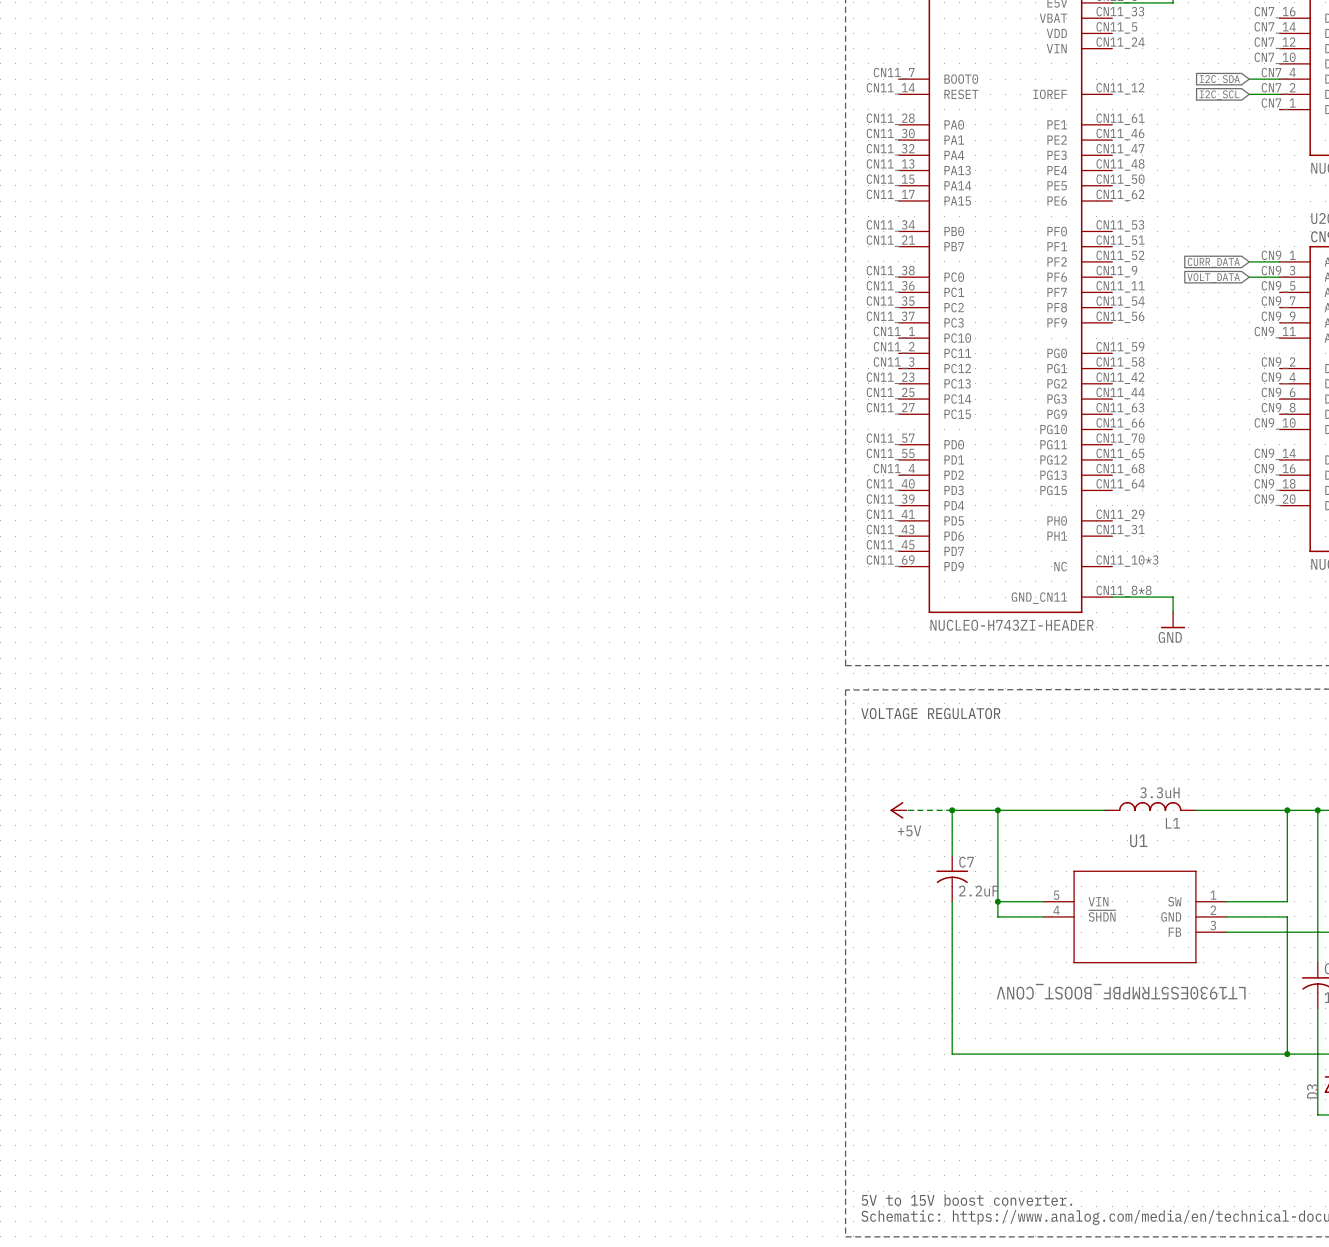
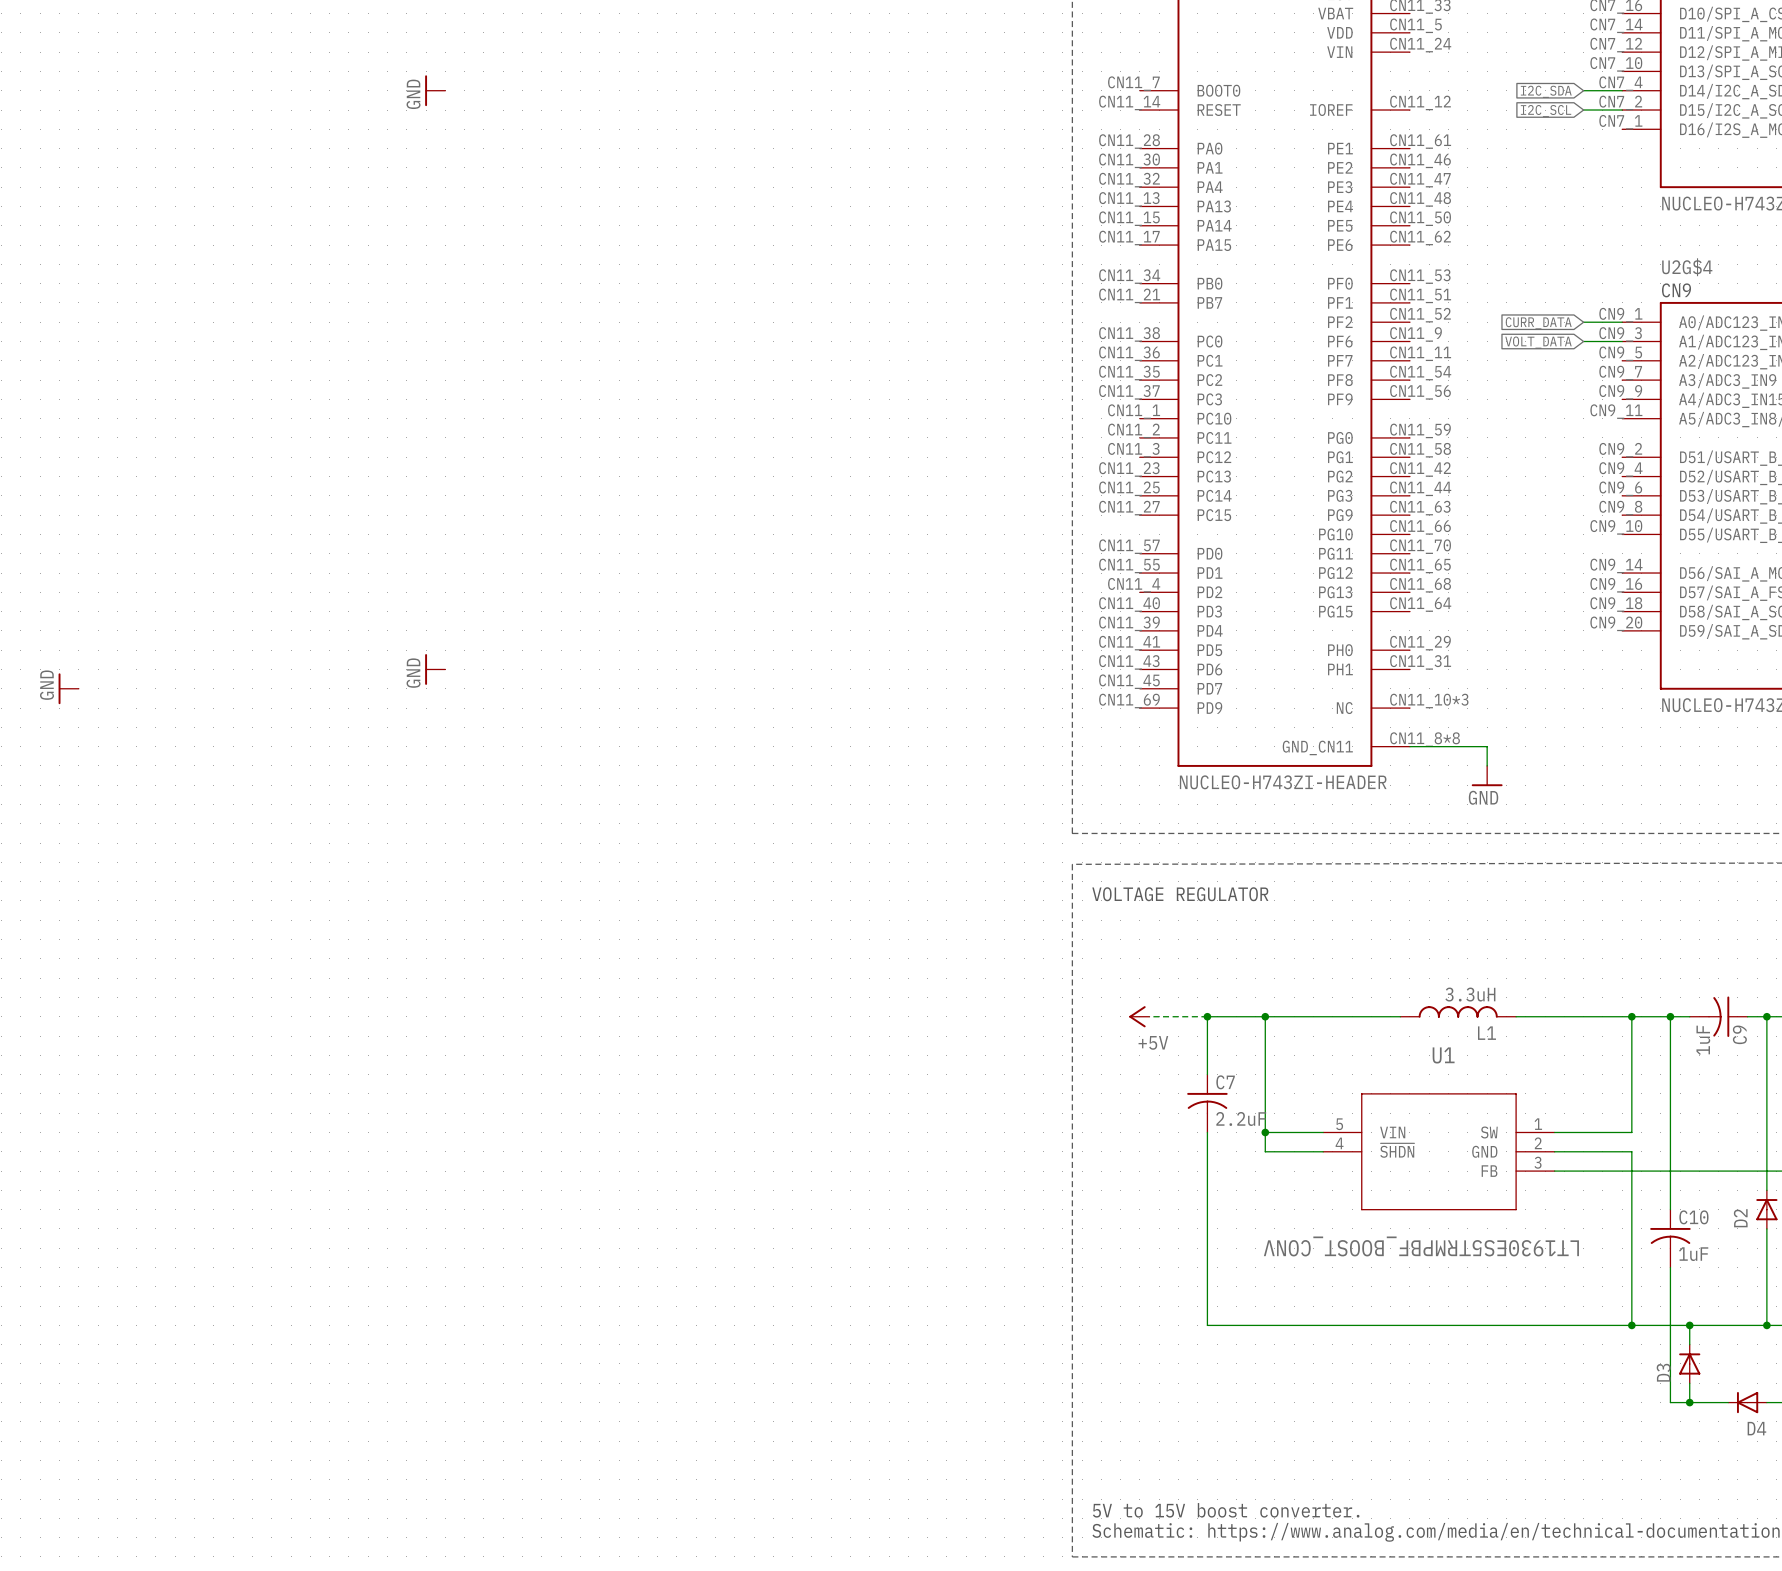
power symbol: none -> GND (435, 90)
power symbol: none -> GND (435, 669)
power symbol: none -> GND (68, 688)

